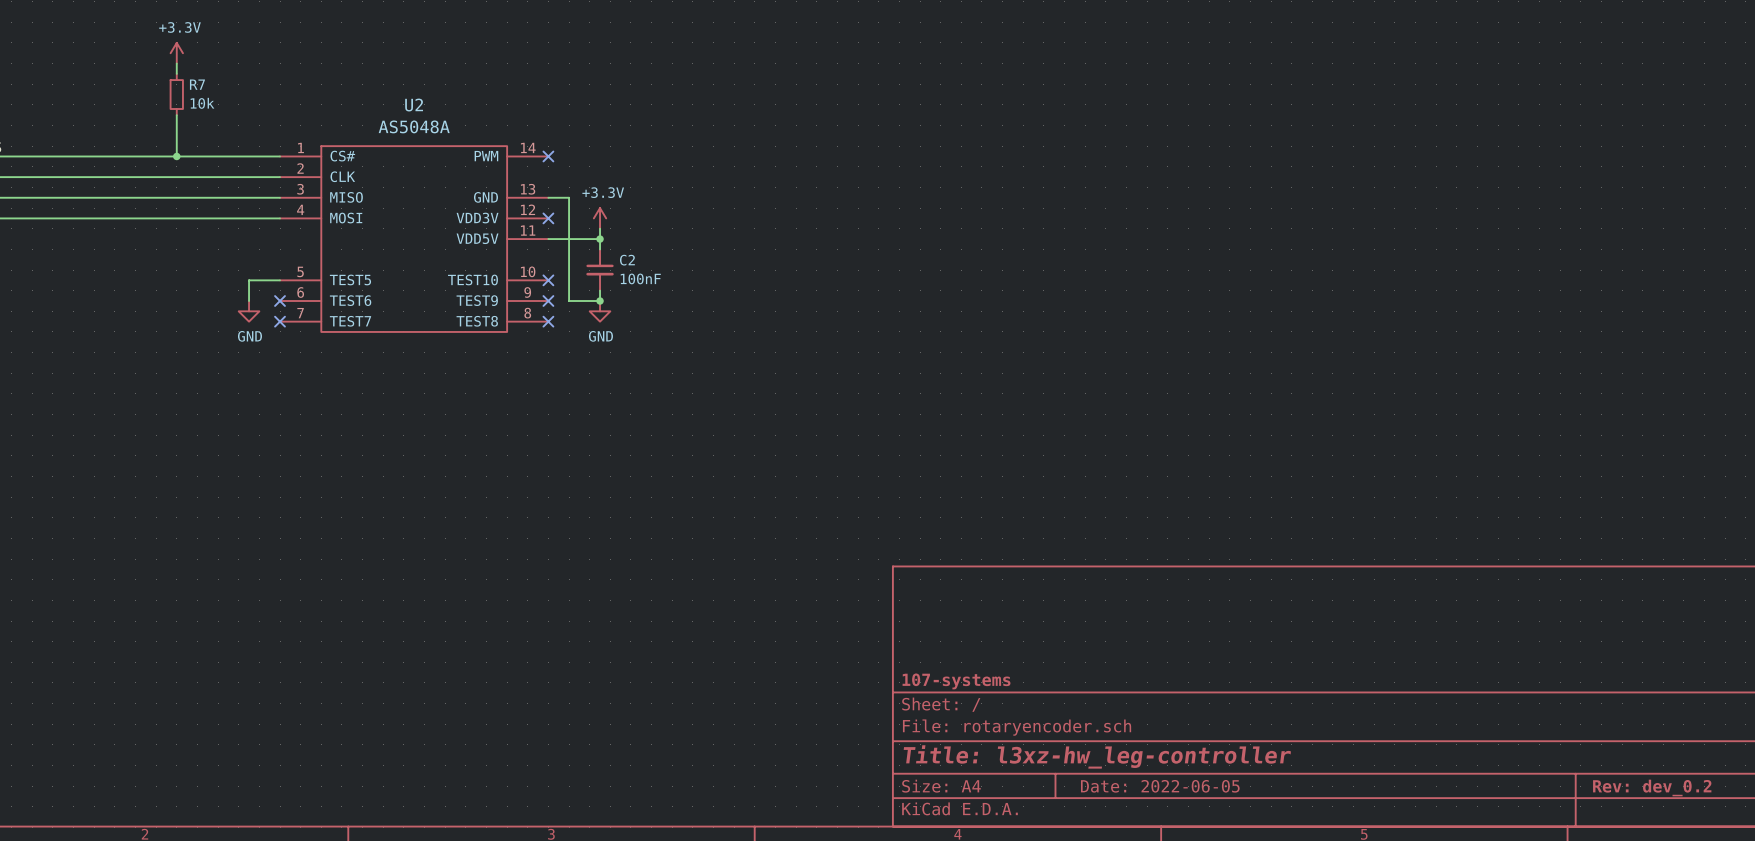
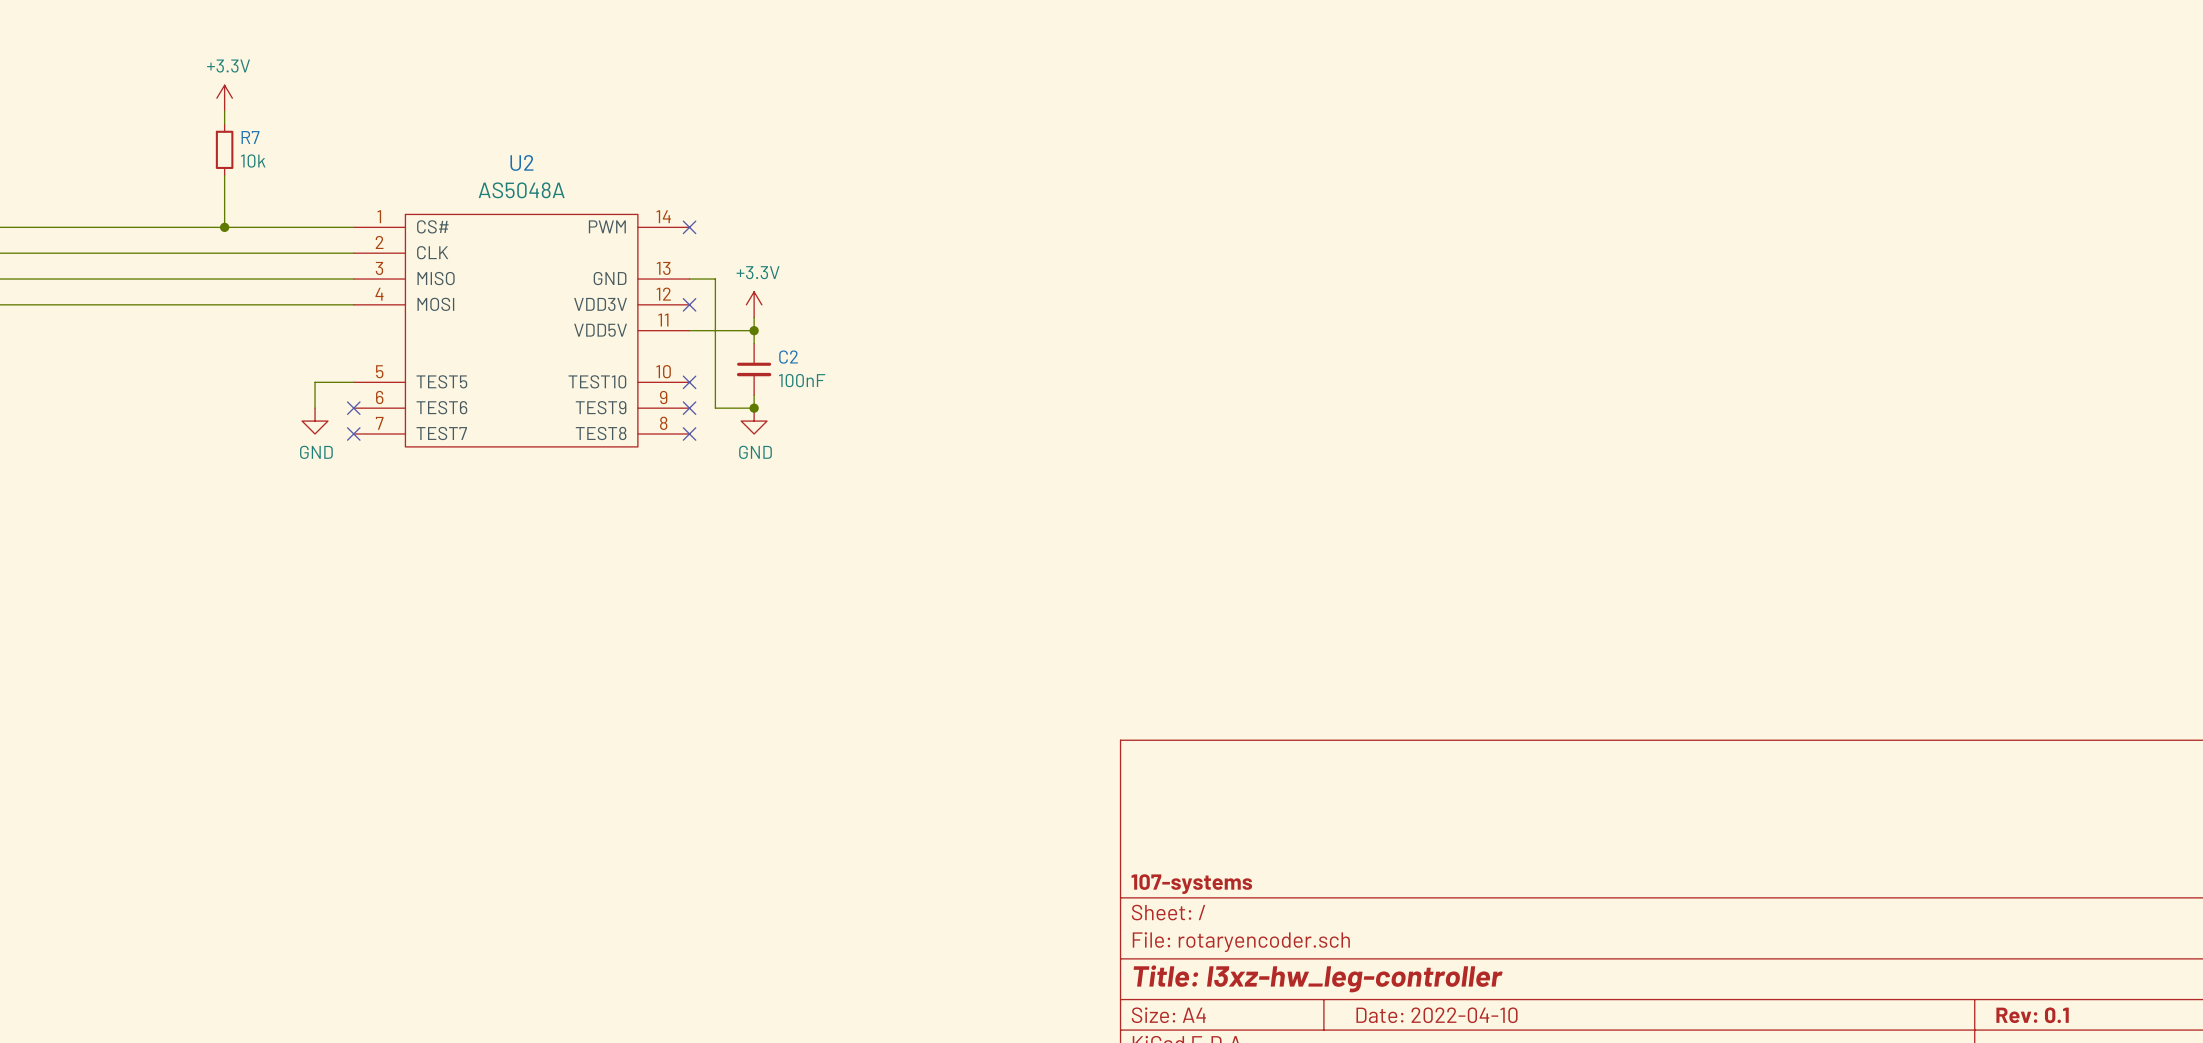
title block: Date: 2022-06-05 (1160, 786) -> Date: 2022-04-10 (1437, 1015)
title block: Rev: dev_0.2 (1652, 787) -> Rev: 0.1 (2032, 1015)

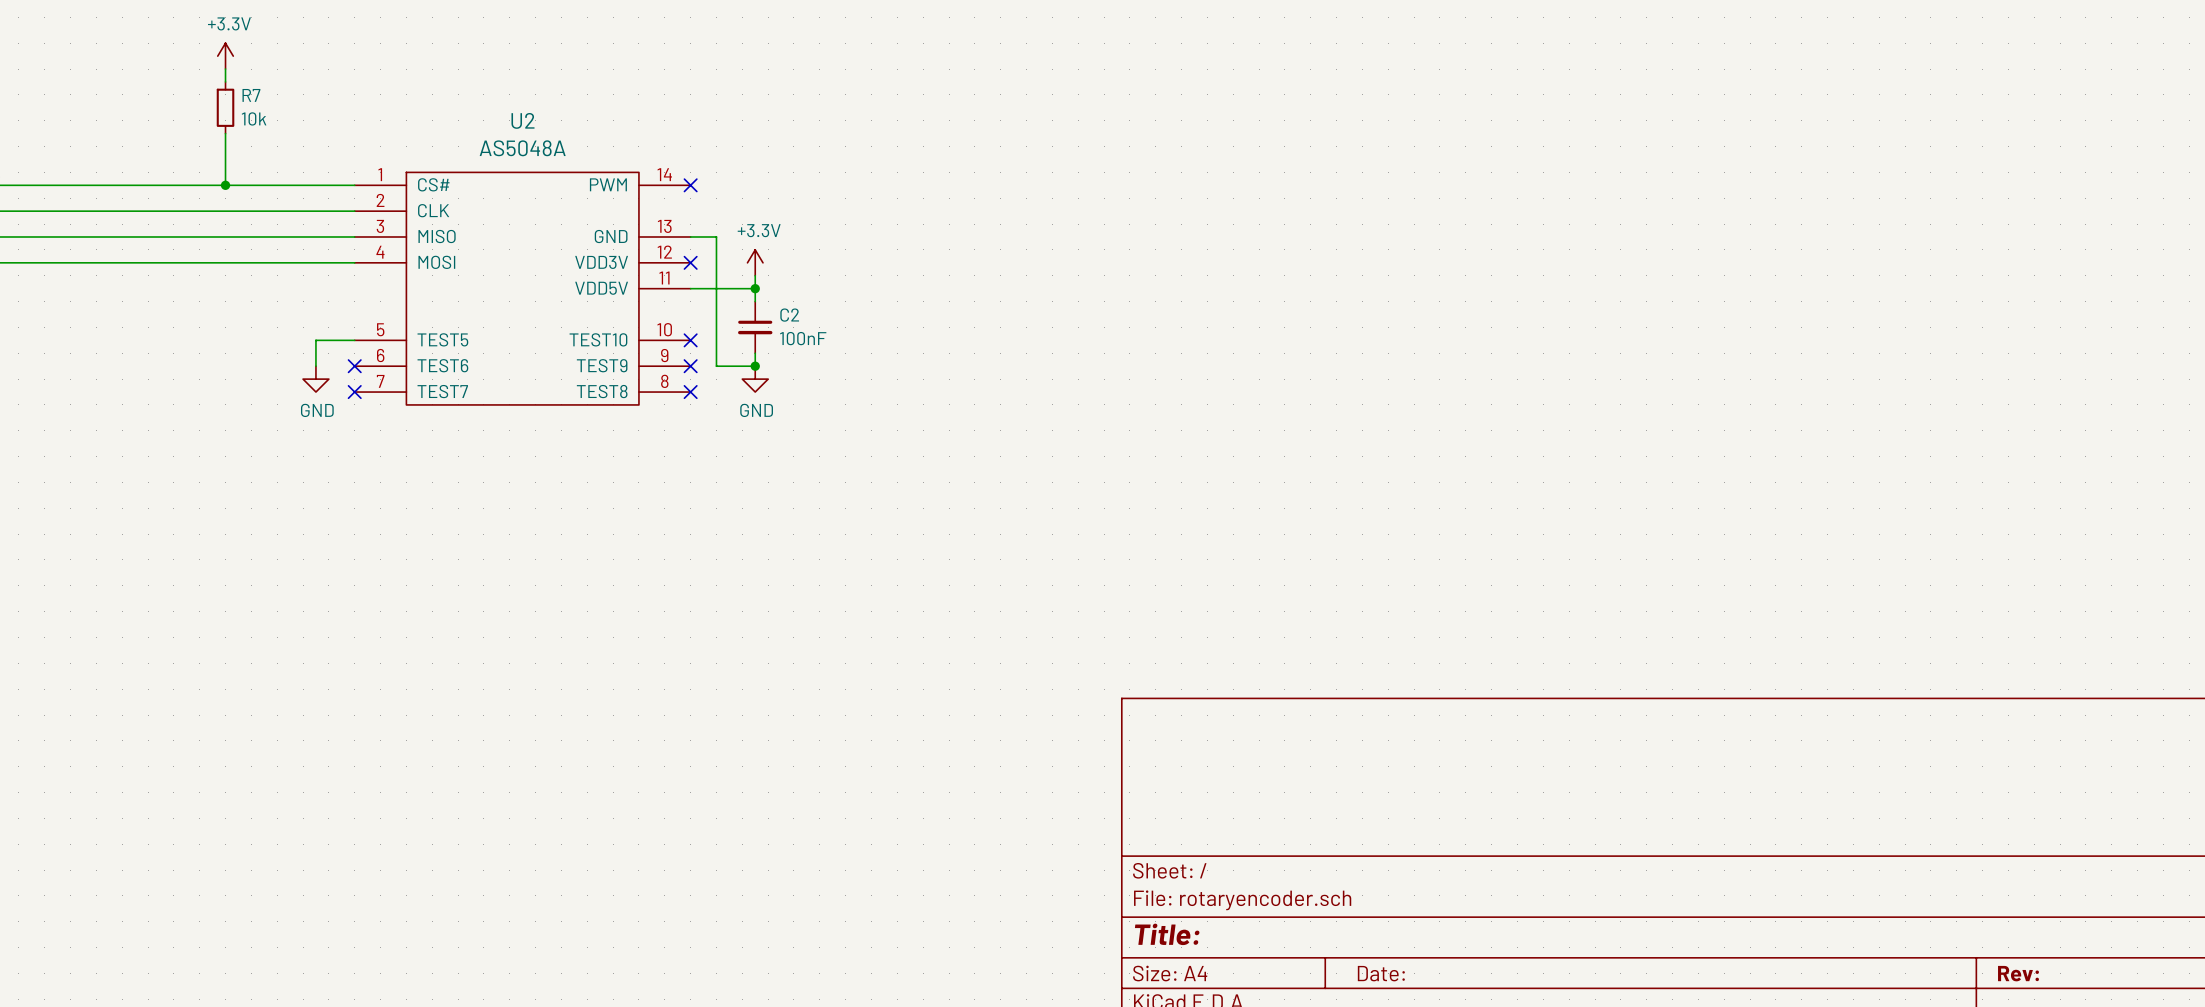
title block: 107-systems (1191, 884) -> none
title block: Title: l3xz-hw_leg-controller (1318, 978) -> Title: (1167, 934)
title block: Date: 2022-04-10 (1437, 1015) -> Date: (1381, 973)
title block: Rev: 0.1 (2032, 1015) -> Rev: (2018, 973)

